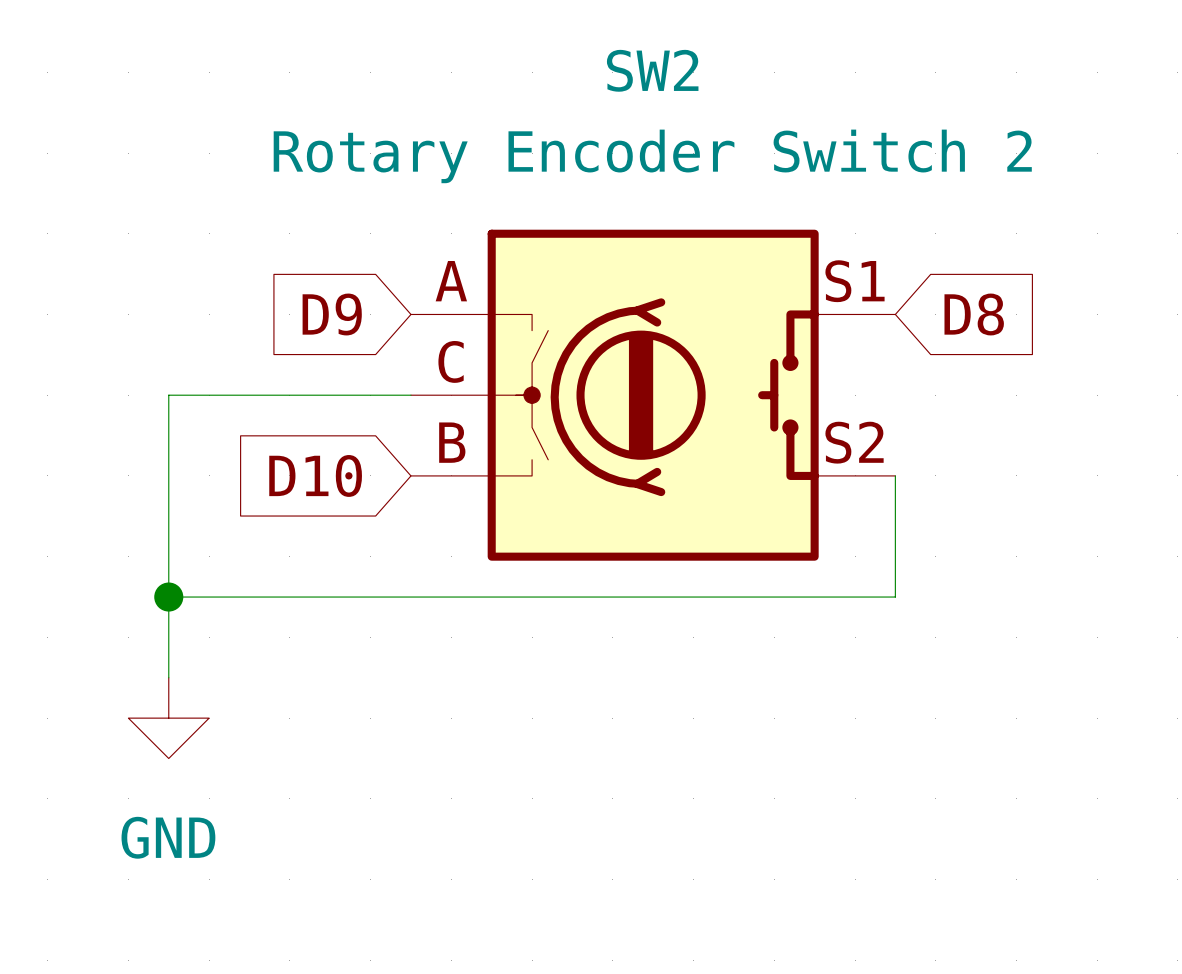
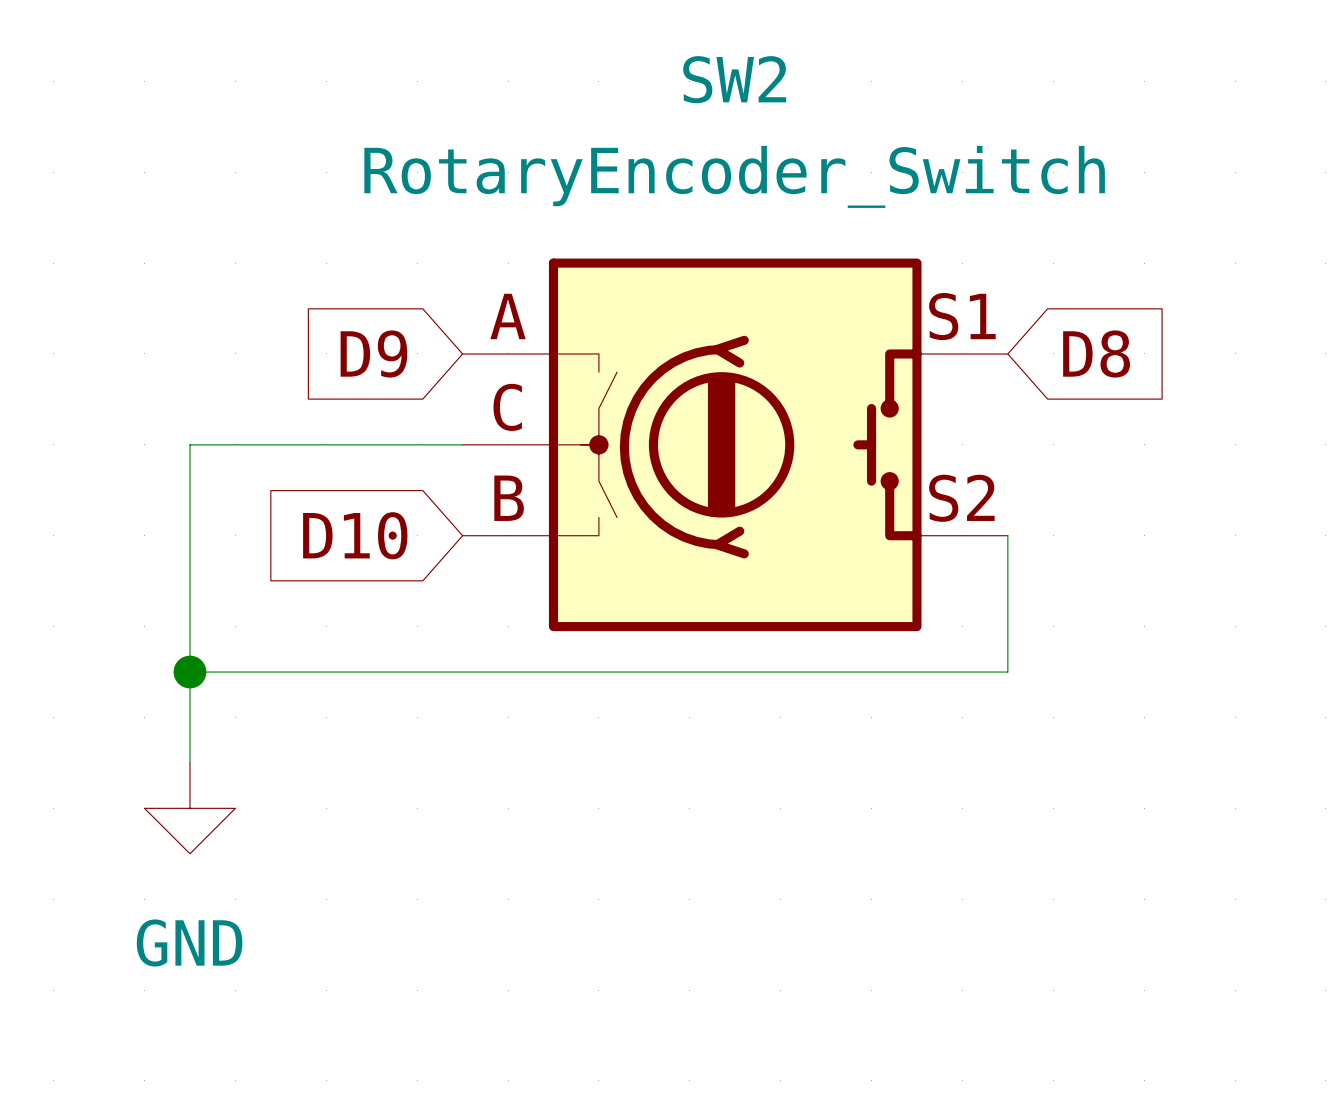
SW2 value: Rotary Encoder Switch 2 (652, 156) -> RotaryEncoder_Switch (734, 176)

